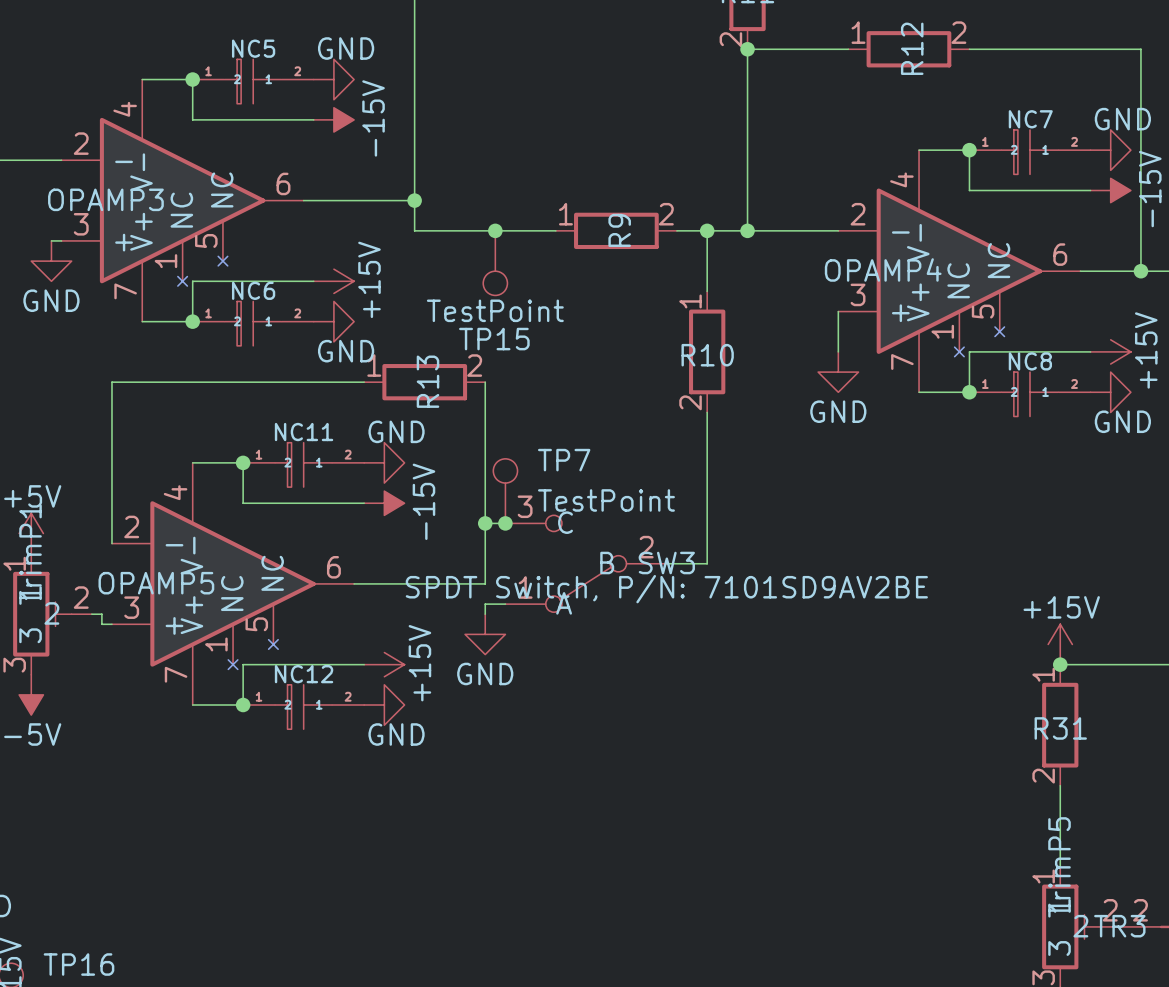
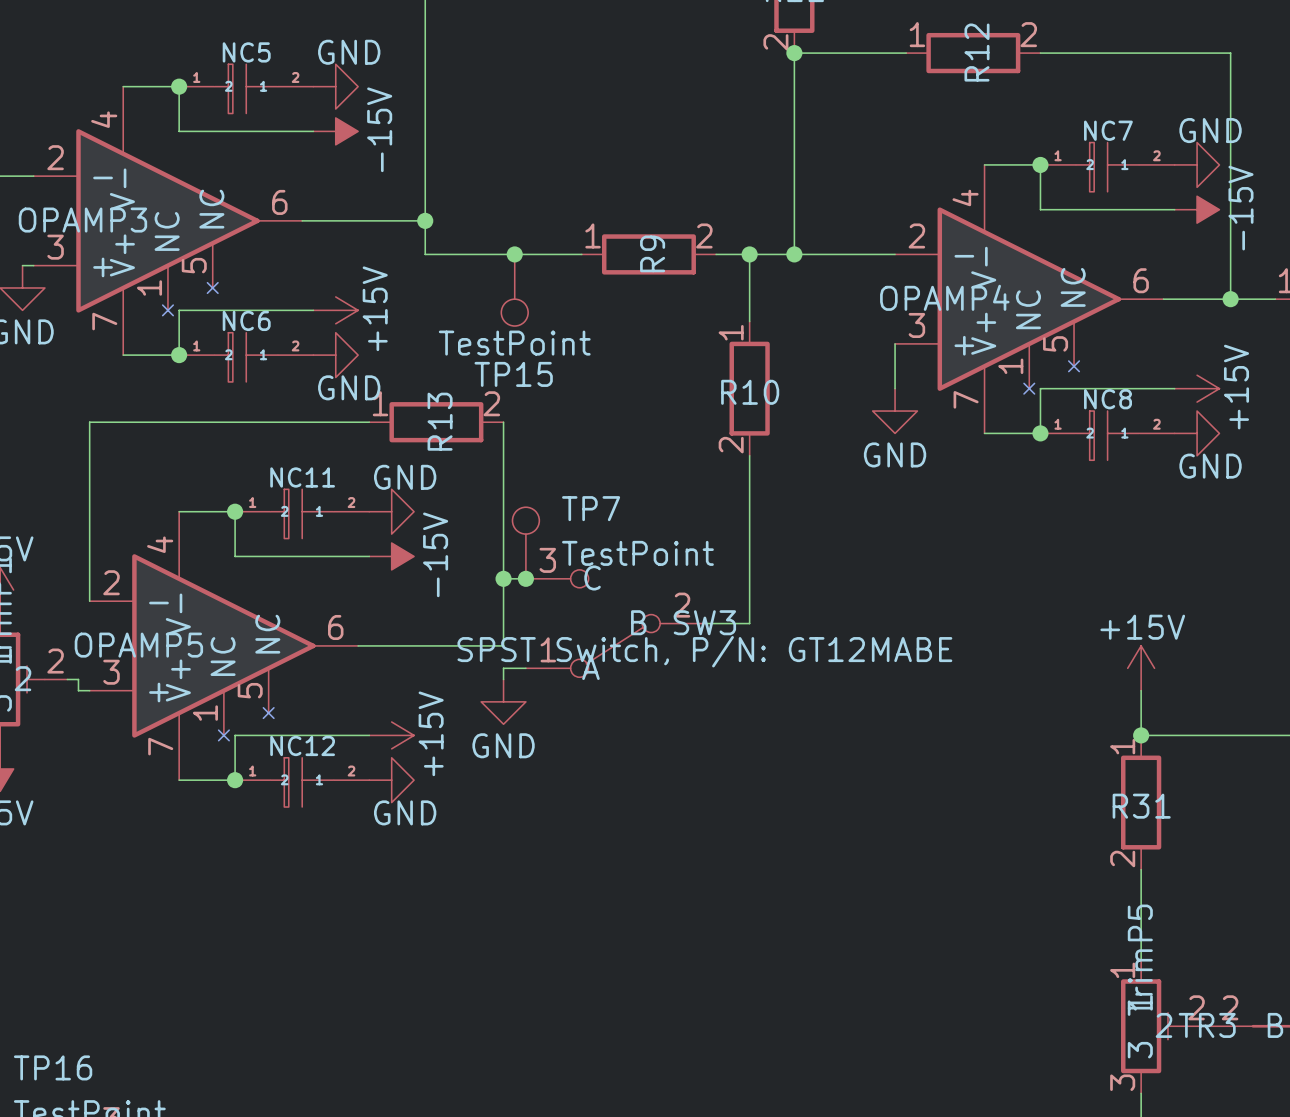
SW3 value: SPDT Switch, P/N: 7101SD9AV2BE (666, 589) -> SPST Switch, P/N: GT12MABE (704, 651)
power symbol position: +15V (1060, 644) -> +15V (1141, 668)

